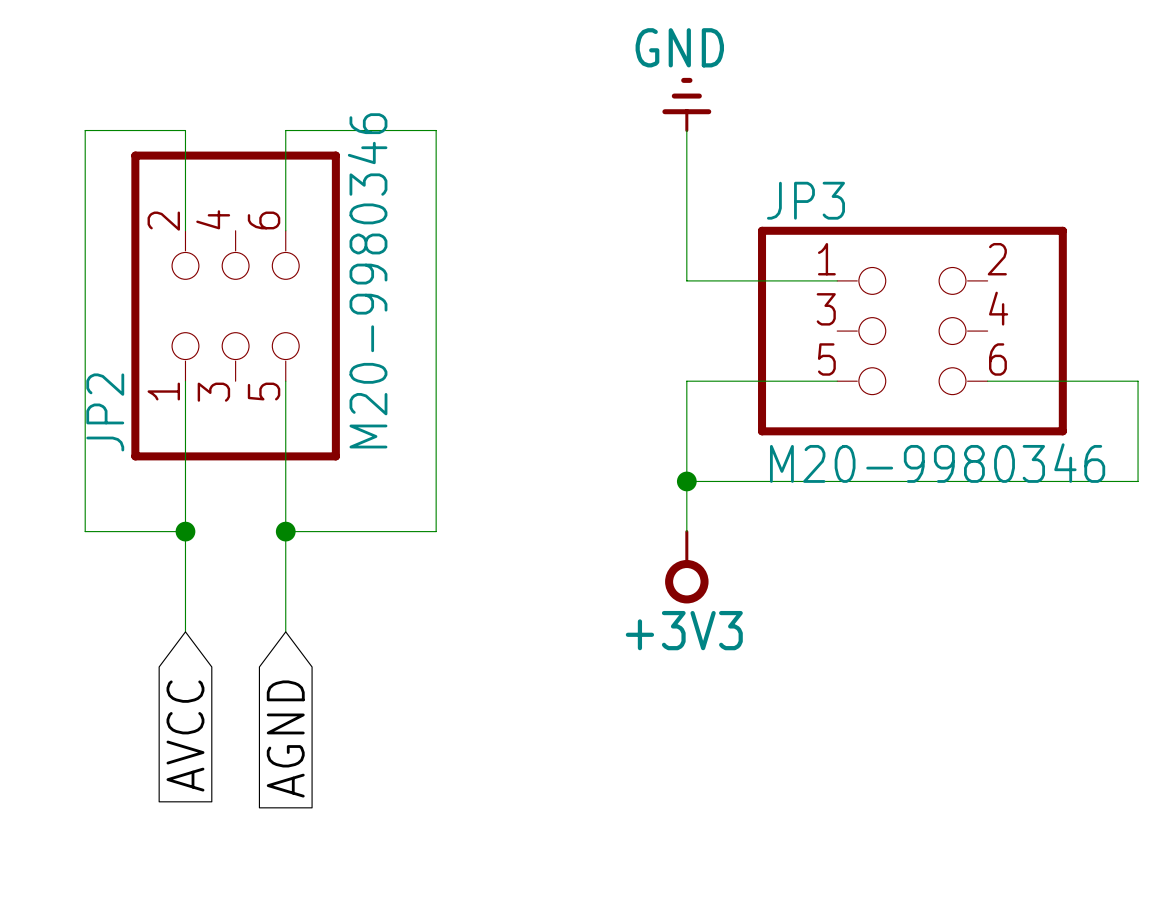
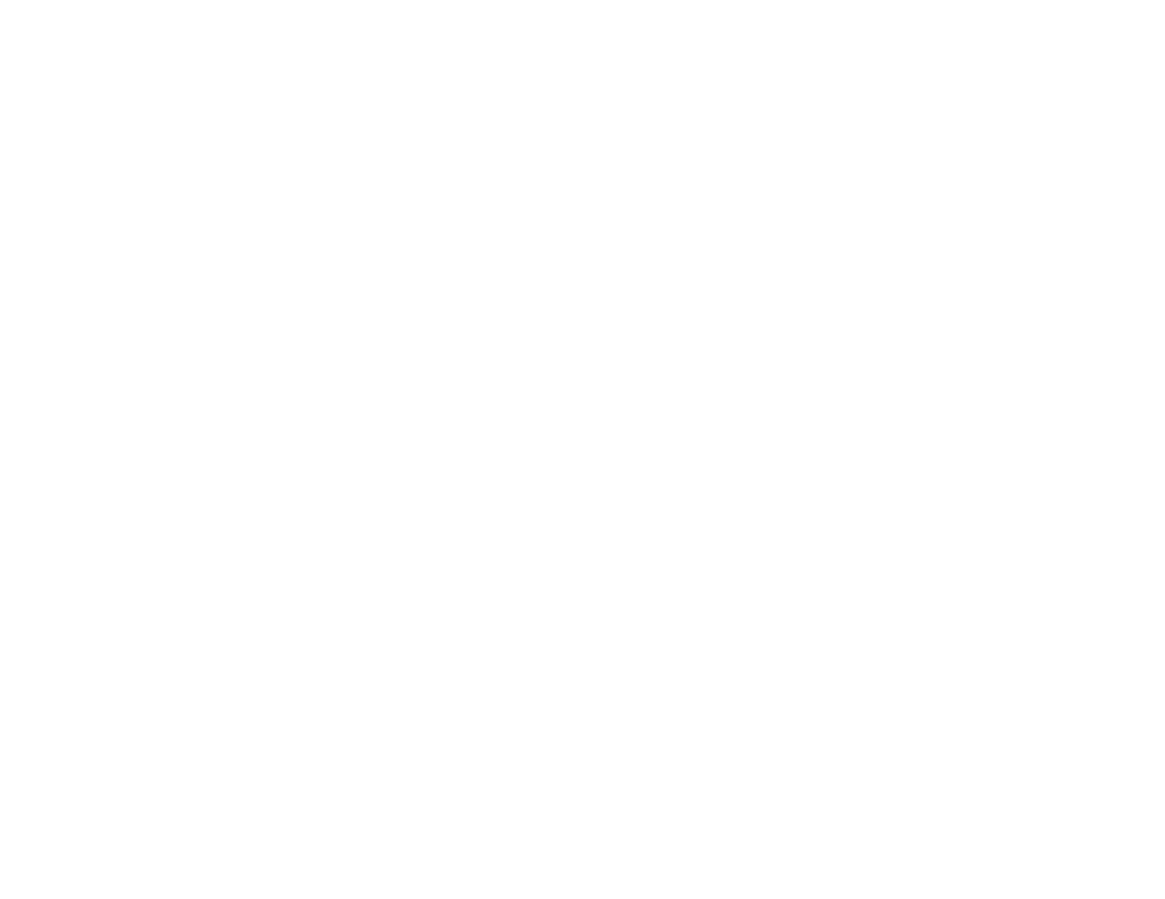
power symbol: GND (686, 104) -> none
wire: (686, 130) (686, 280) (837, 280) -> none
wire: (185, 230) (185, 130) (85, 130) (85, 531) (185, 531) -> none
wire: (285, 230) (285, 130) (436, 130) (436, 531) (285, 531) -> none
JP2: M20-9980346 (235, 305) -> none
JP3: M20-9980346 (912, 331) -> none
wire: (185, 381) (185, 631) -> none
wire: (285, 381) (285, 631) -> none
wire: (837, 381) (686, 381) (686, 531) -> none
wire: (987, 381) (1138, 381) (1138, 481) (686, 481) -> none
junction: (686, 481) -> none
junction: (185, 531) -> none
junction: (285, 531) -> none
power symbol: +3V3 (686, 566) -> none
global label: AVCC (185, 735) -> none
global label: AGND (285, 738) -> none

